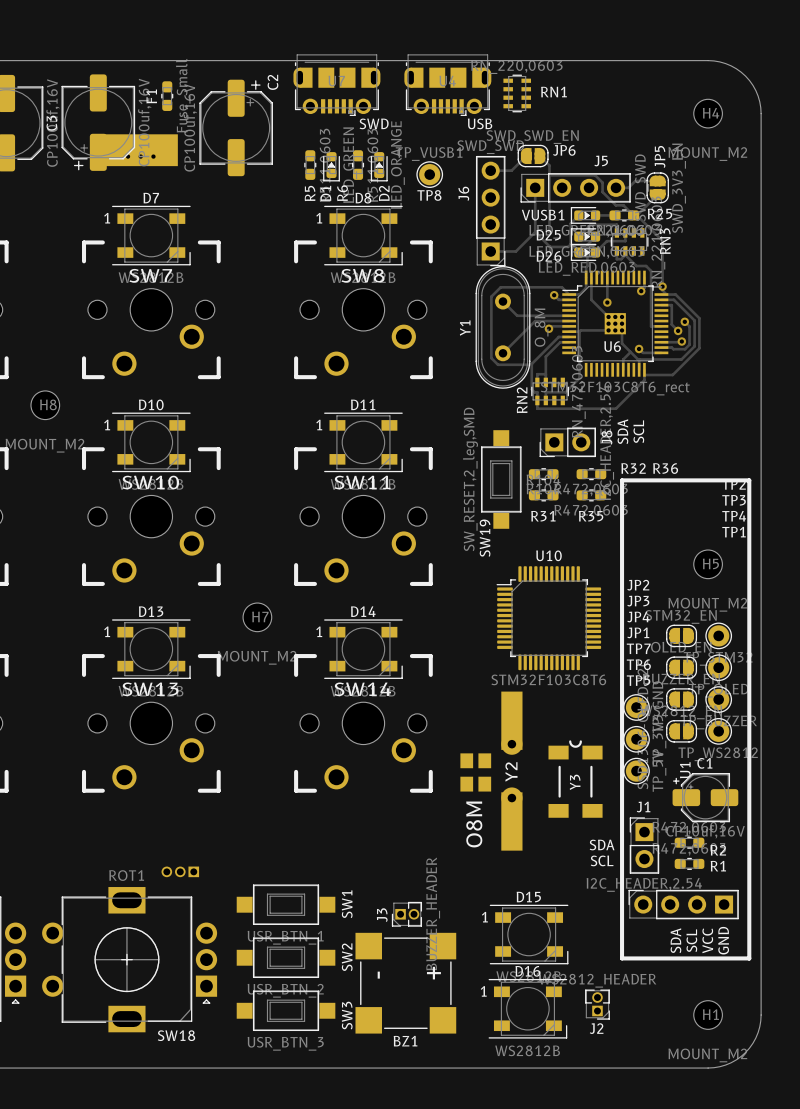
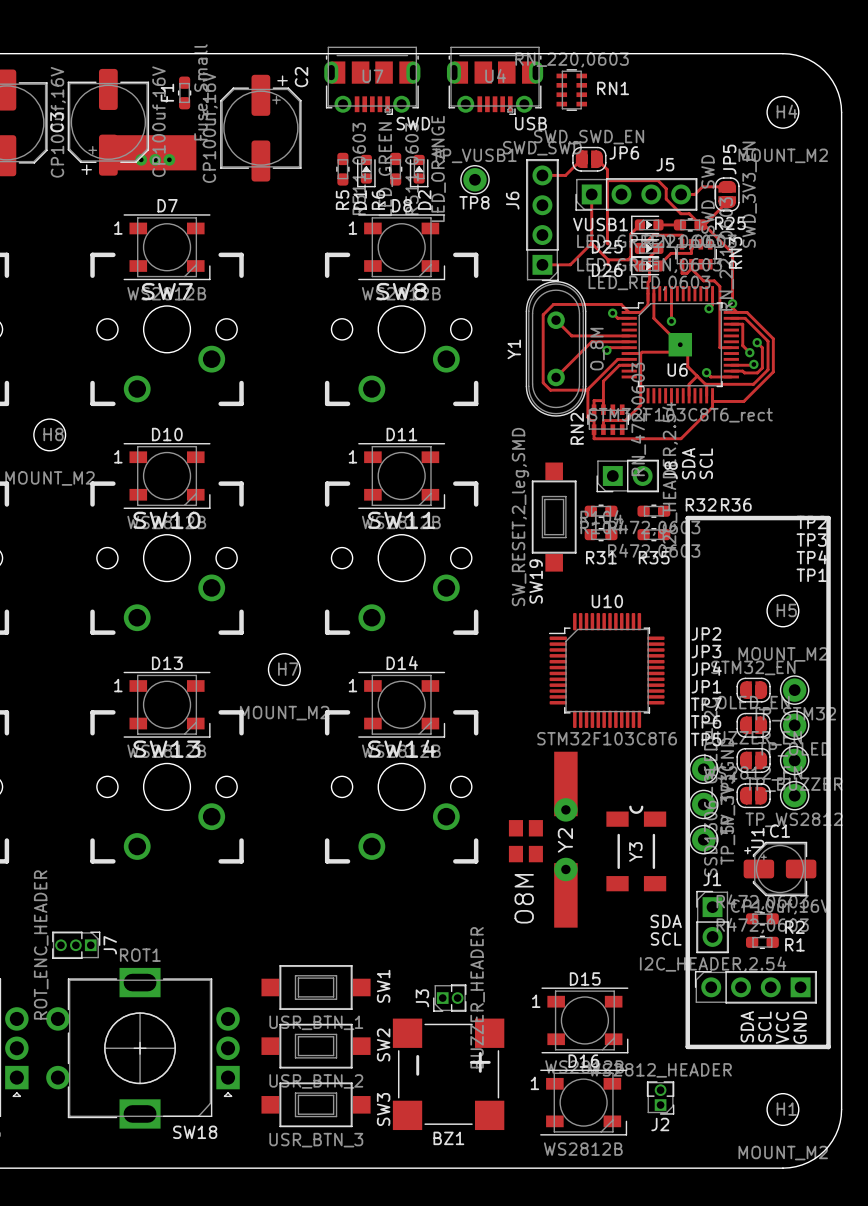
U6 footprint: [562, 270, 669, 377] -> [621, 286, 739, 404]
J7 side: bottom (180, 871) -> top (76, 945)

